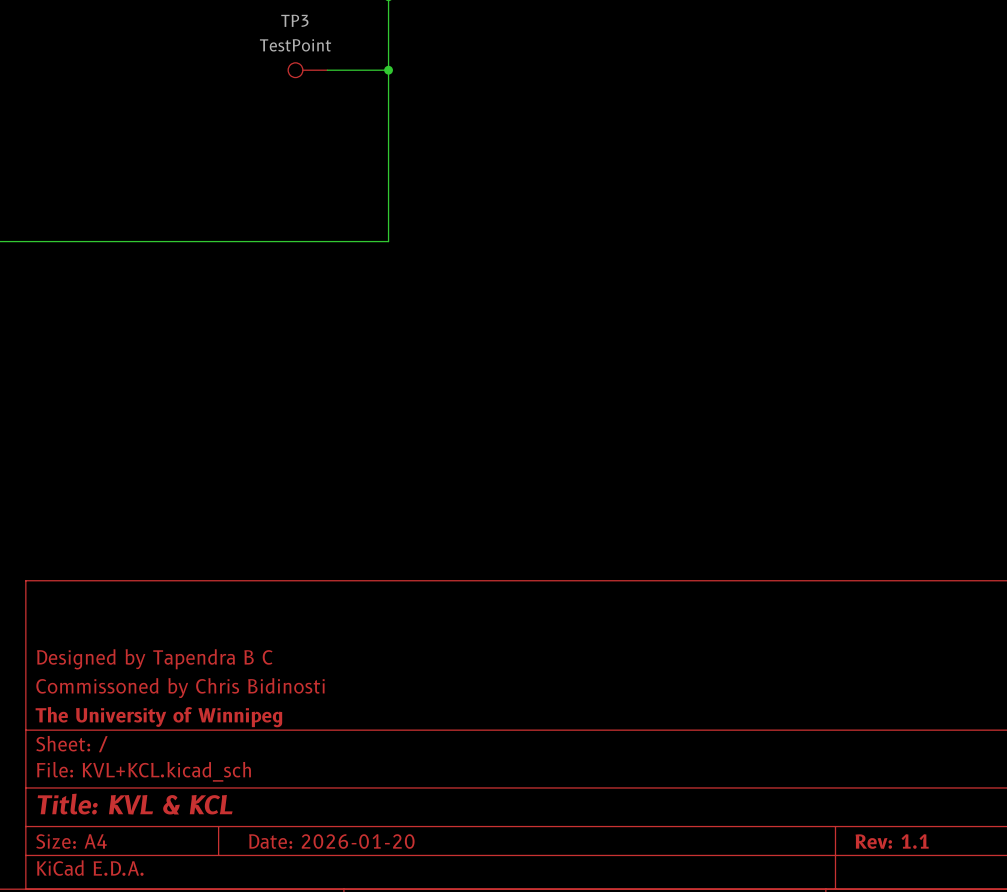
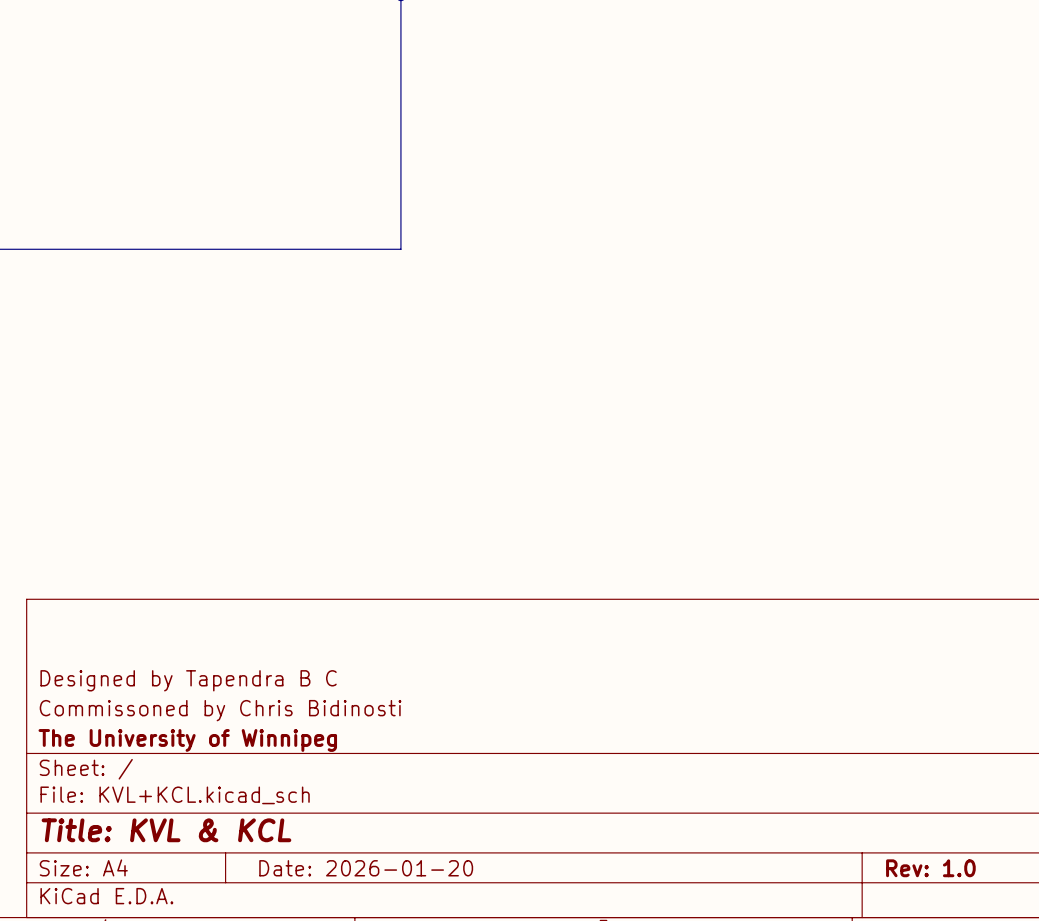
TP3: TestPoint (307, 70) -> none
wire: (327, 70) (388, 70) -> none
junction: (388, 70) -> none
title block: Rev: 1.1 (892, 841) -> Rev: 1.0 (930, 868)

